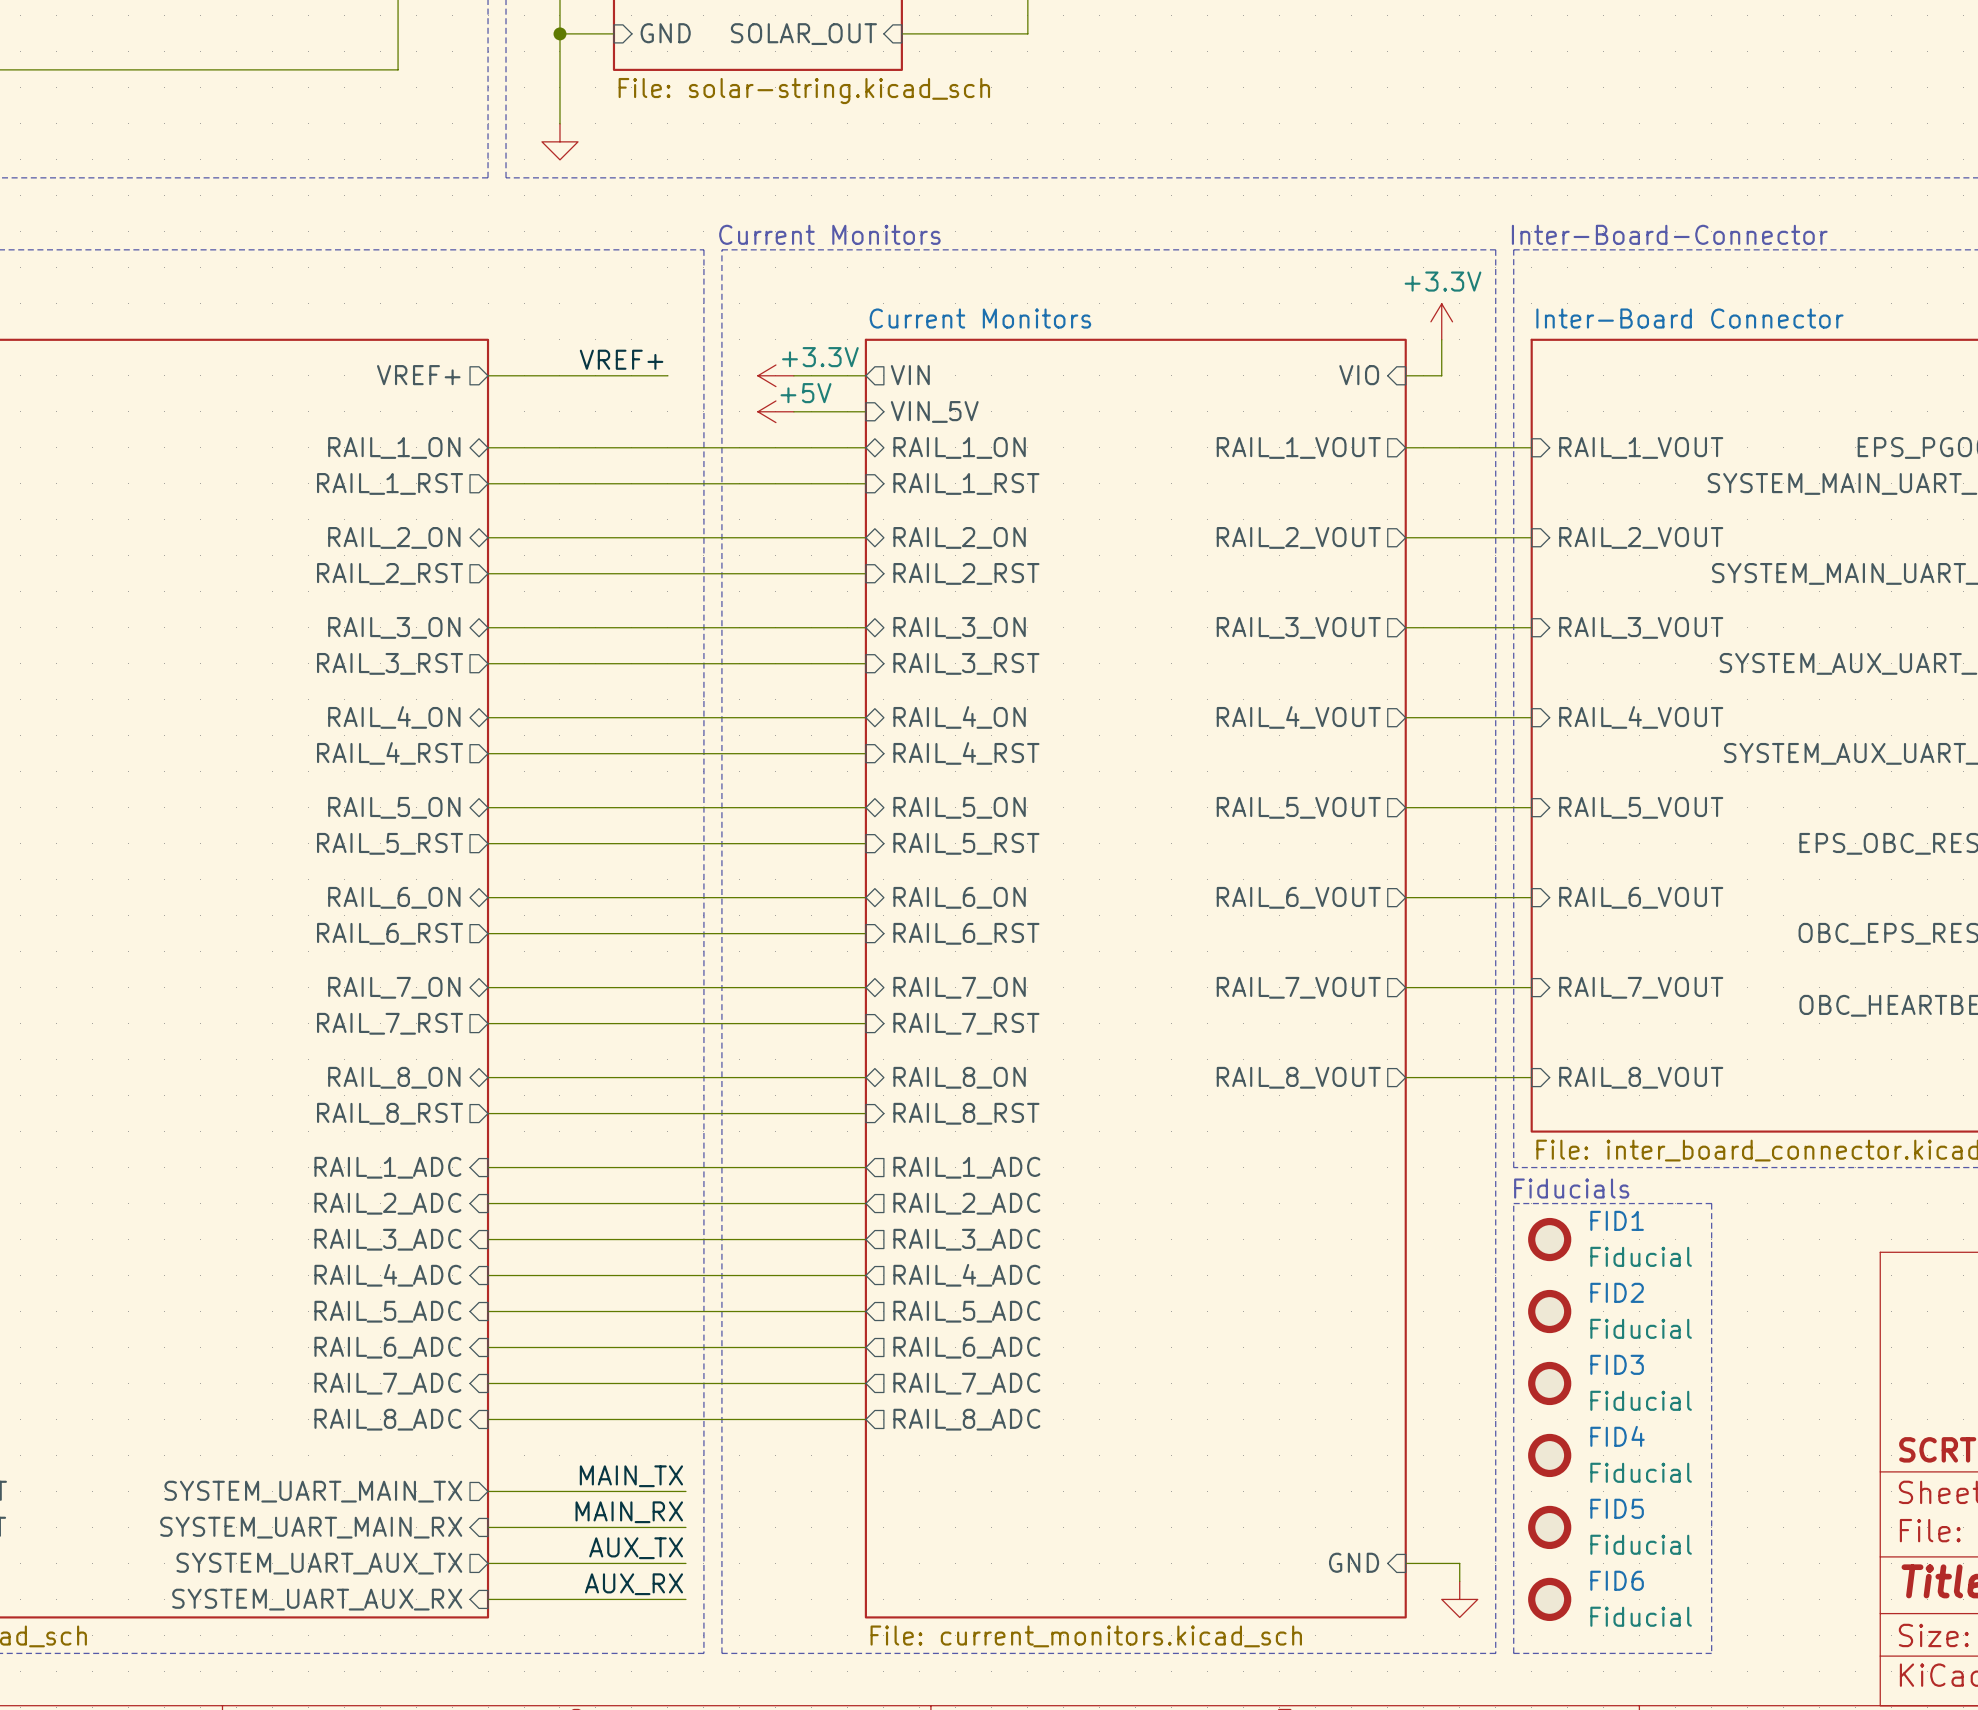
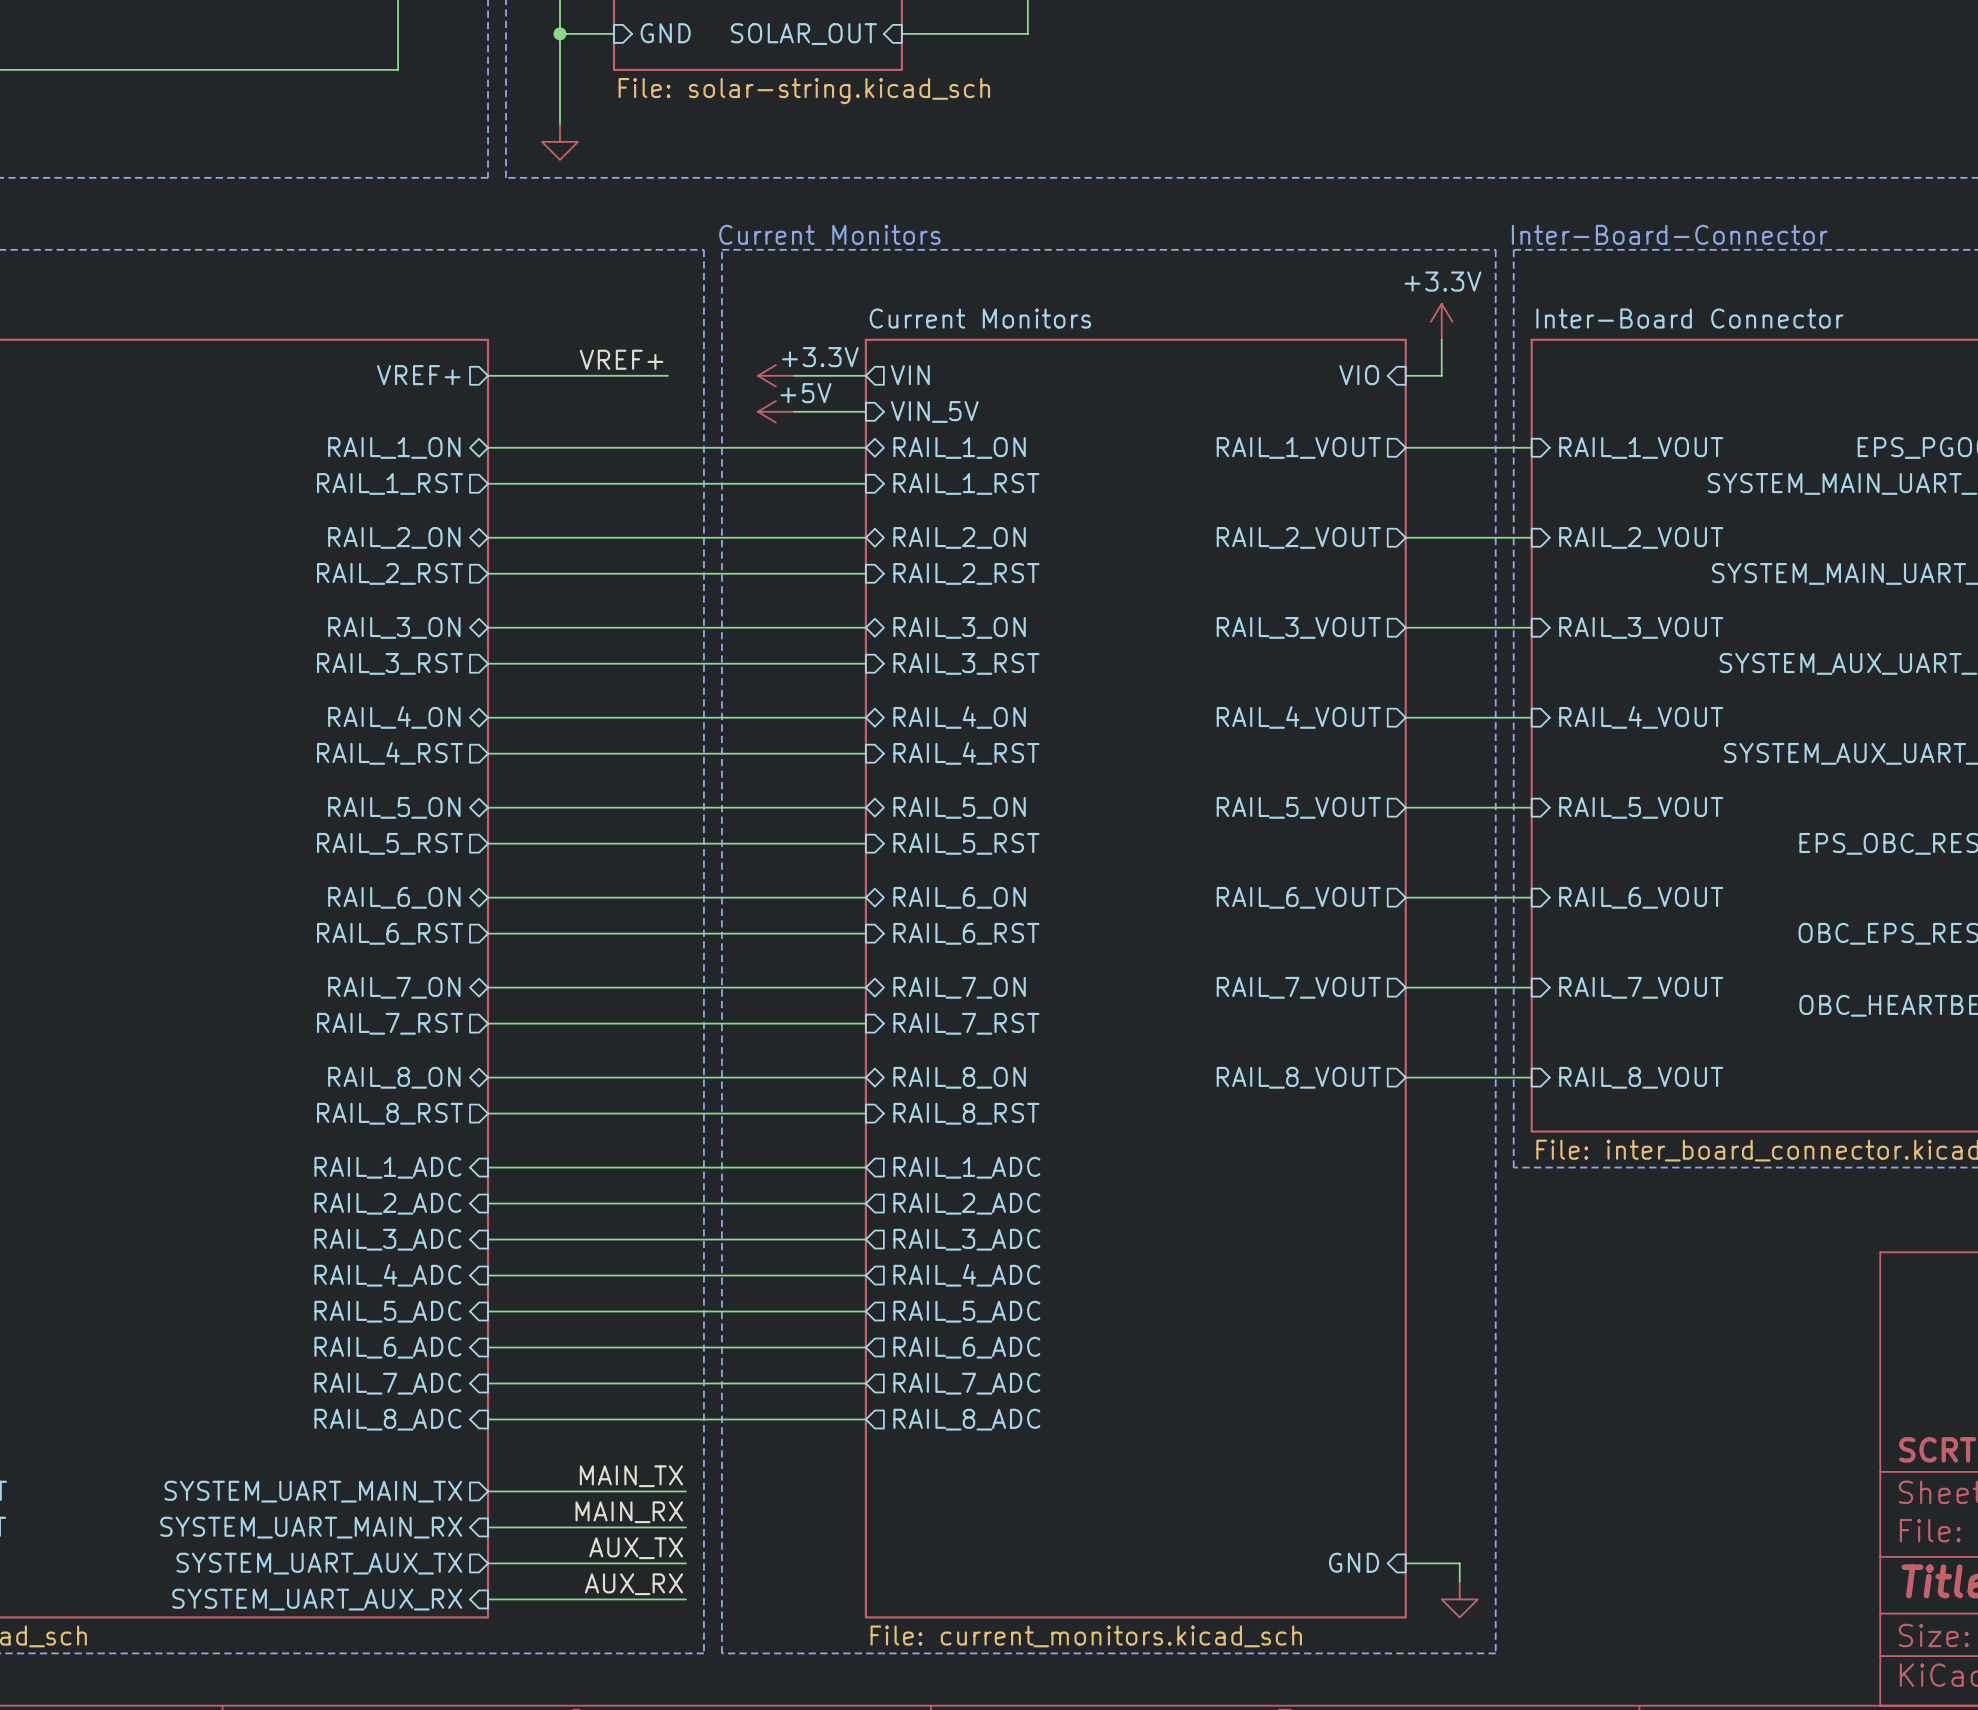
text: Fiducials (1571, 1188) -> none
line: (1513, 1203) (1711, 1203) (1711, 1653) (1513, 1653) (1513, 1203) -> none
FID1: Fiducial (1549, 1239) -> none
FID2: Fiducial (1549, 1311) -> none
FID3: Fiducial (1549, 1383) -> none
FID4: Fiducial (1549, 1455) -> none
FID5: Fiducial (1549, 1527) -> none
FID6: Fiducial (1549, 1599) -> none

